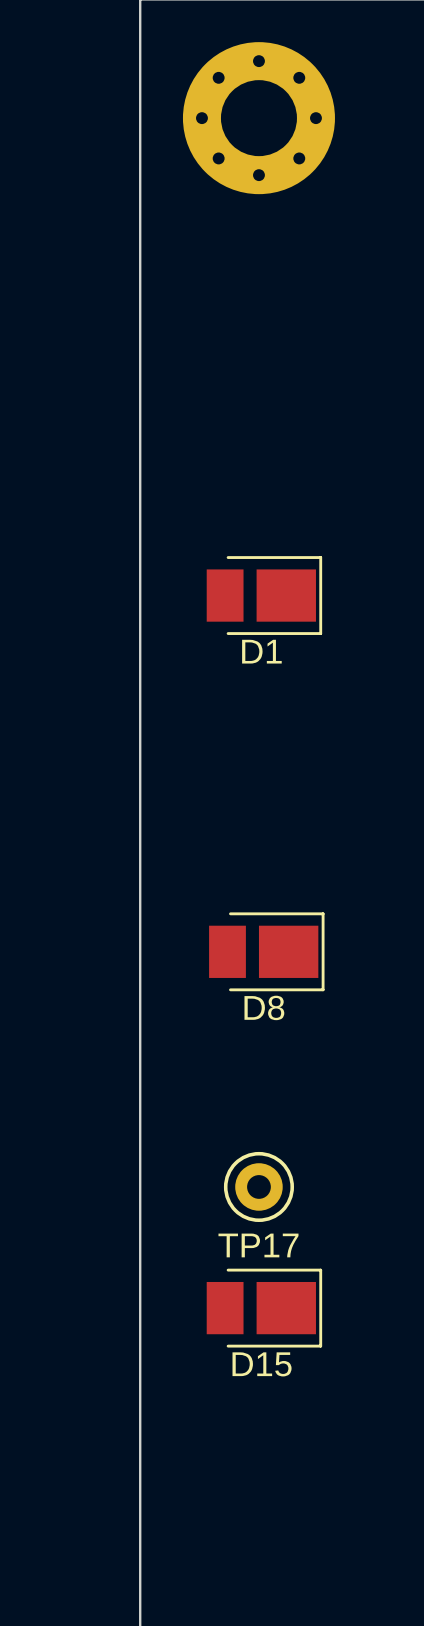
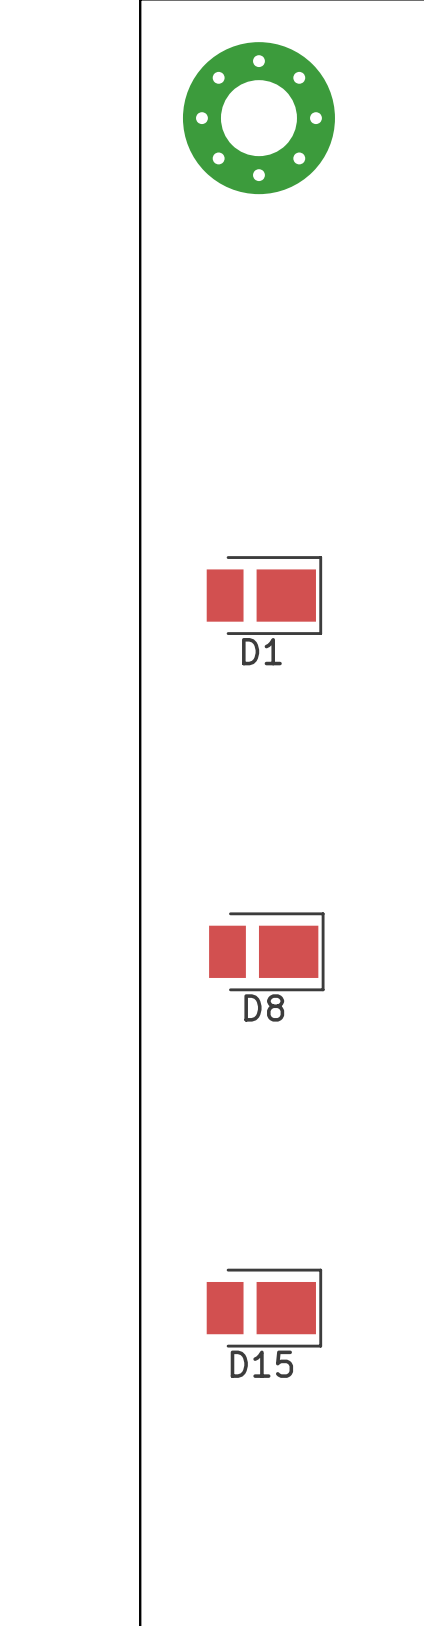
TP17: (258, 1186) -> none

